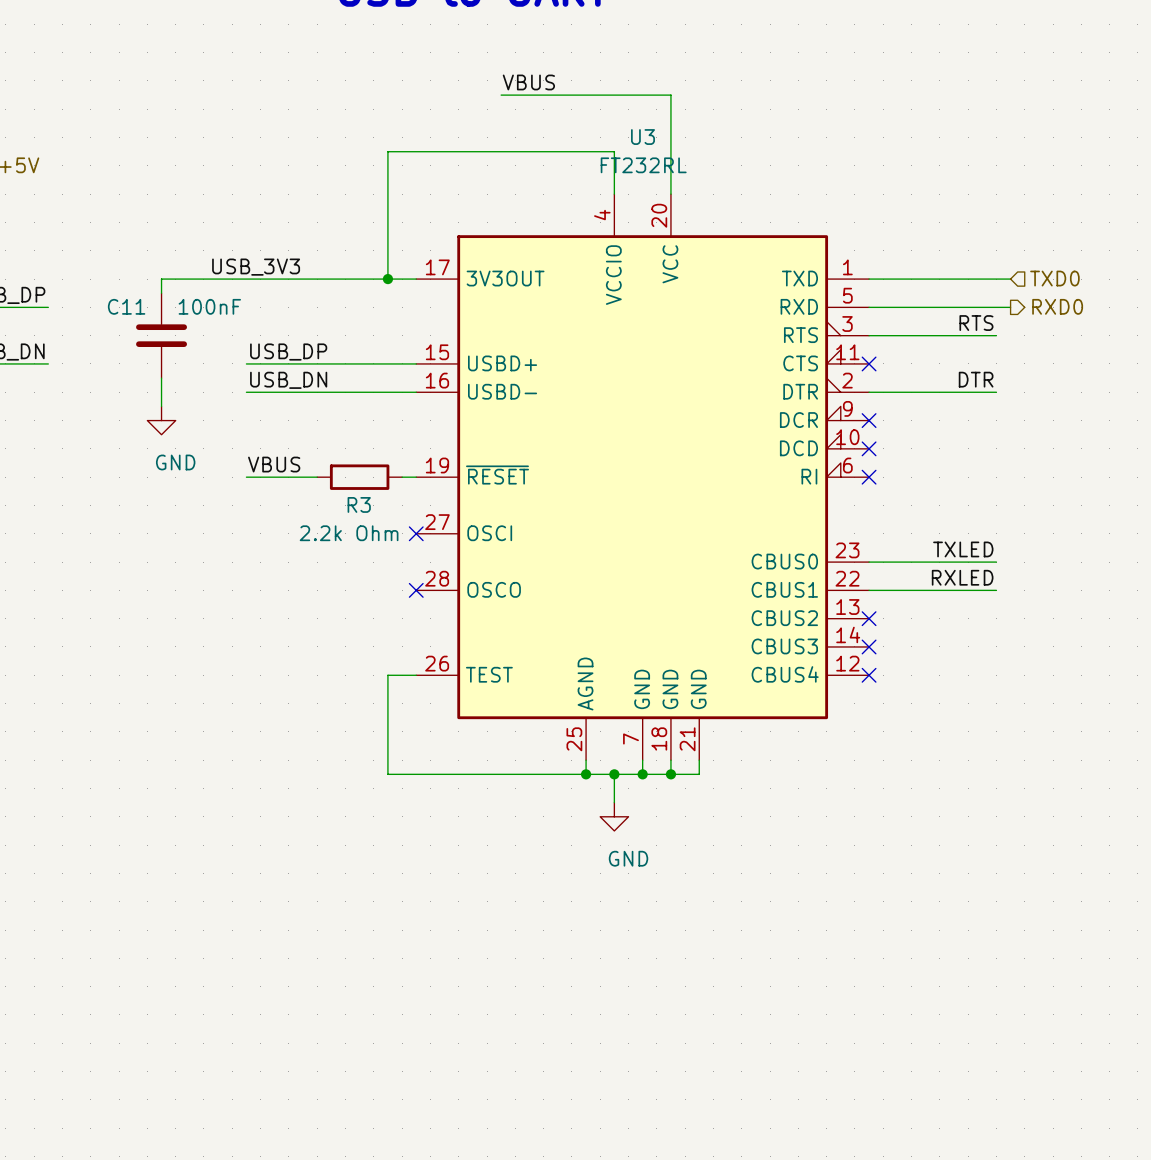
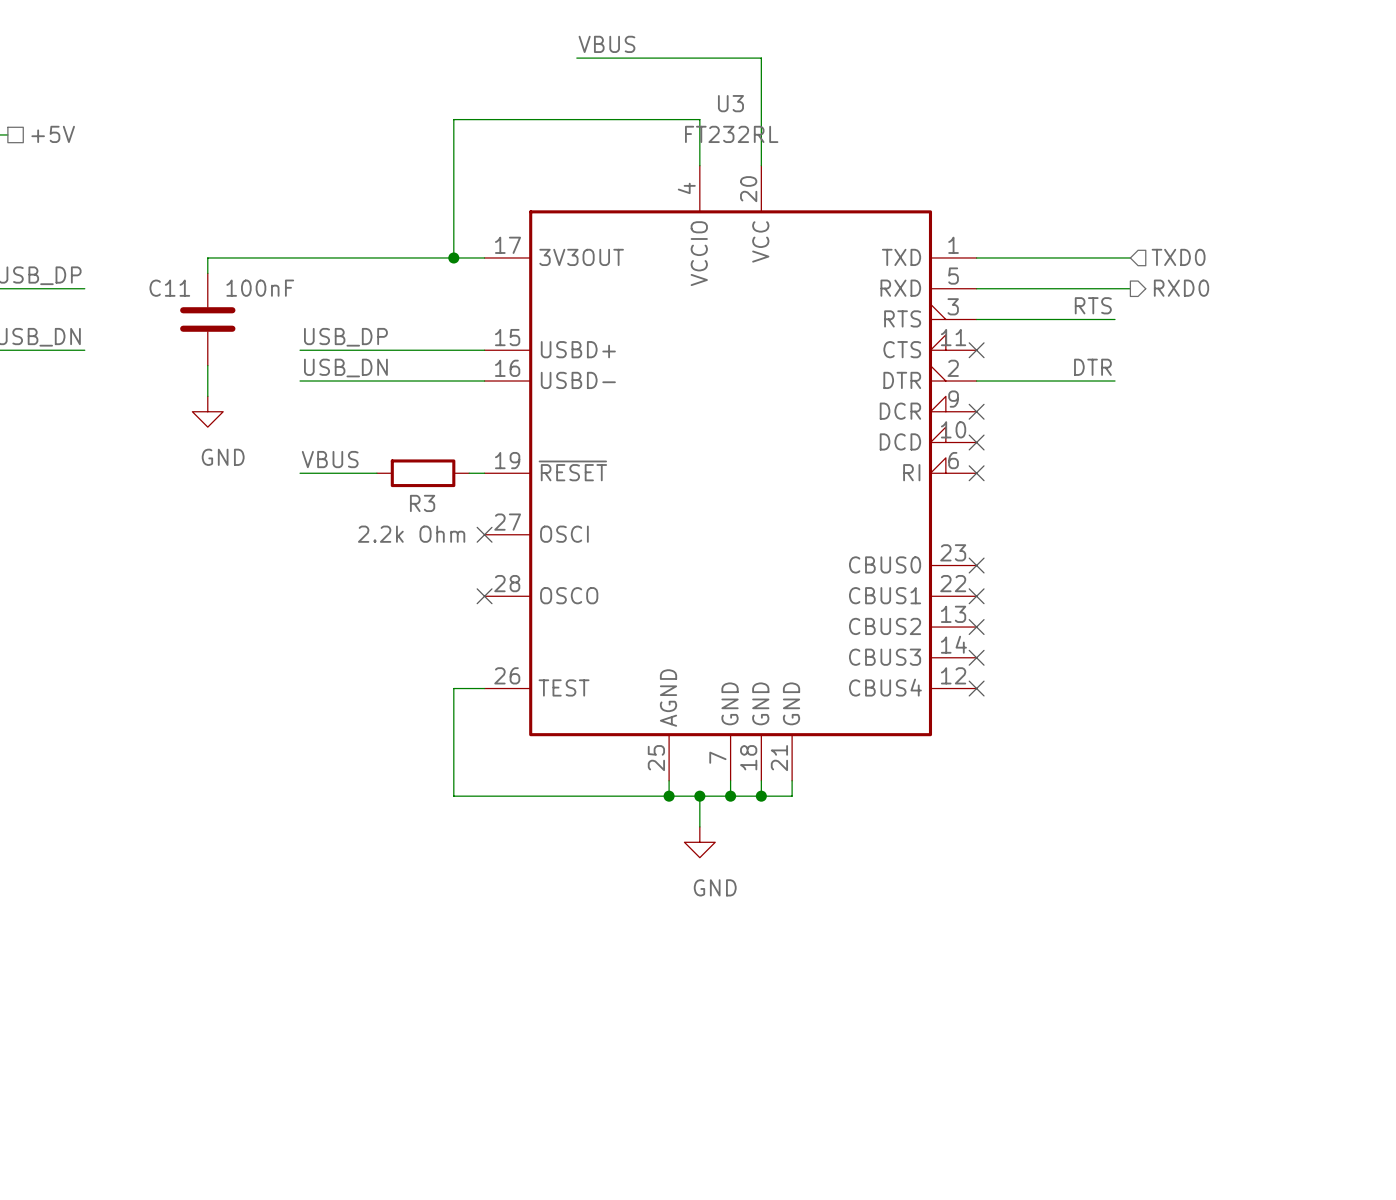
label: USB_3V3 (256, 267) -> none
label: TXLED (963, 549) -> none
wire: (869, 562) (996, 562) -> none
no-connect mark: none -> (976, 565)
label: RXLED (962, 577) -> none
wire: (869, 590) (996, 590) -> none
no-connect mark: none -> (976, 596)

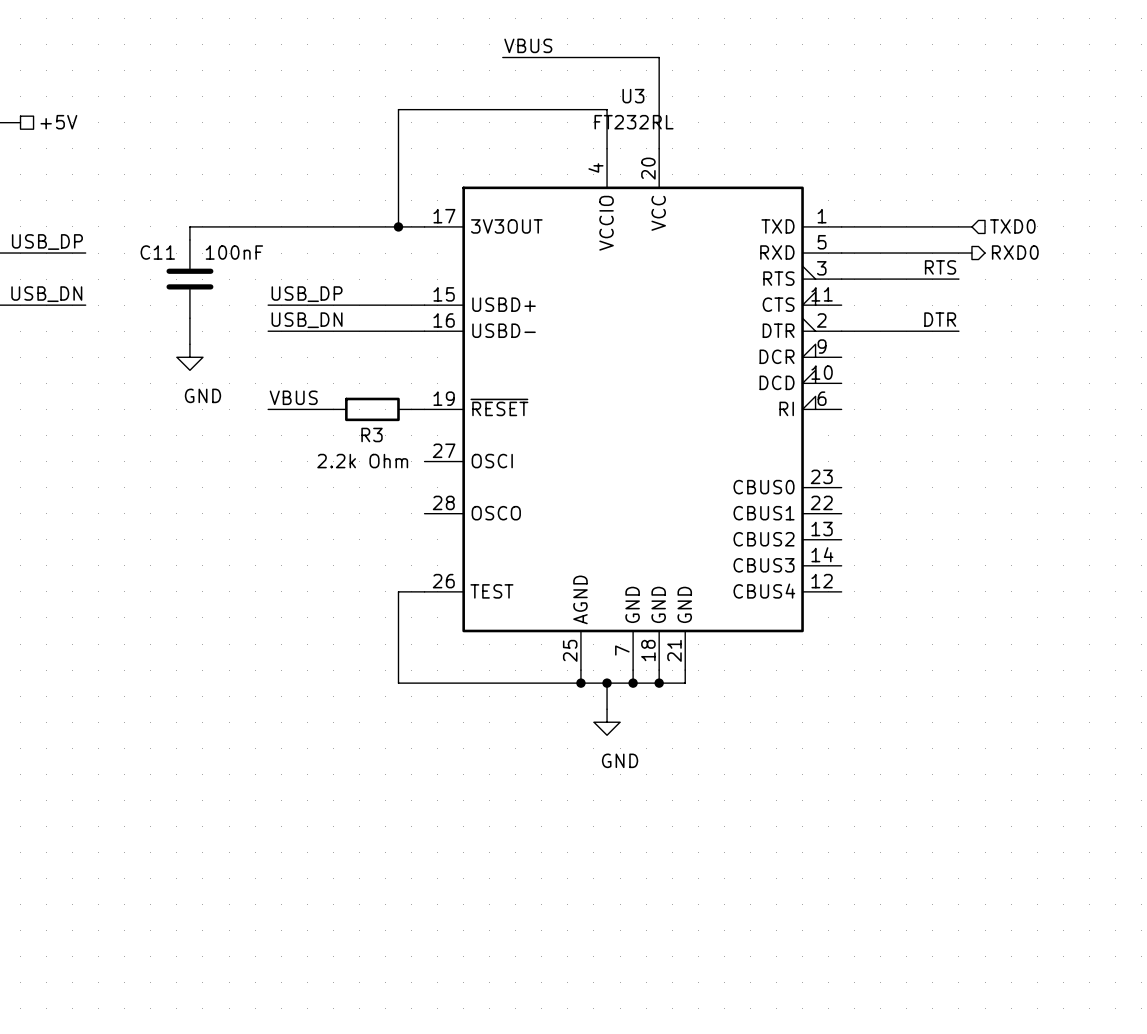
no-connect mark: (976, 350) -> none
no-connect mark: (976, 411) -> none
no-connect mark: (976, 442) -> none
no-connect mark: (976, 473) -> none
no-connect mark: (484, 534) -> none
no-connect mark: (976, 565) -> none
no-connect mark: (484, 596) -> none
no-connect mark: (976, 596) -> none
no-connect mark: (976, 627) -> none
no-connect mark: (976, 657) -> none
no-connect mark: (976, 688) -> none

